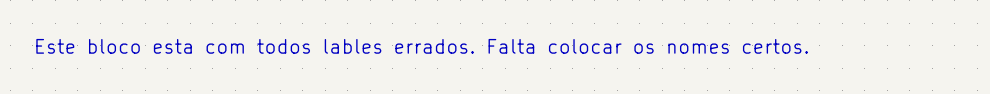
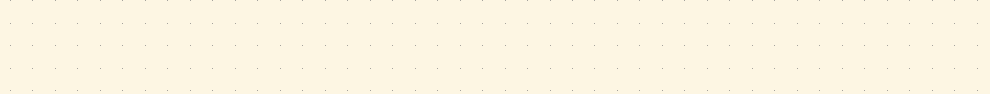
text: Este bloco esta com todos lables errados. Falta colocar os nomes certos. (422, 46) -> none

